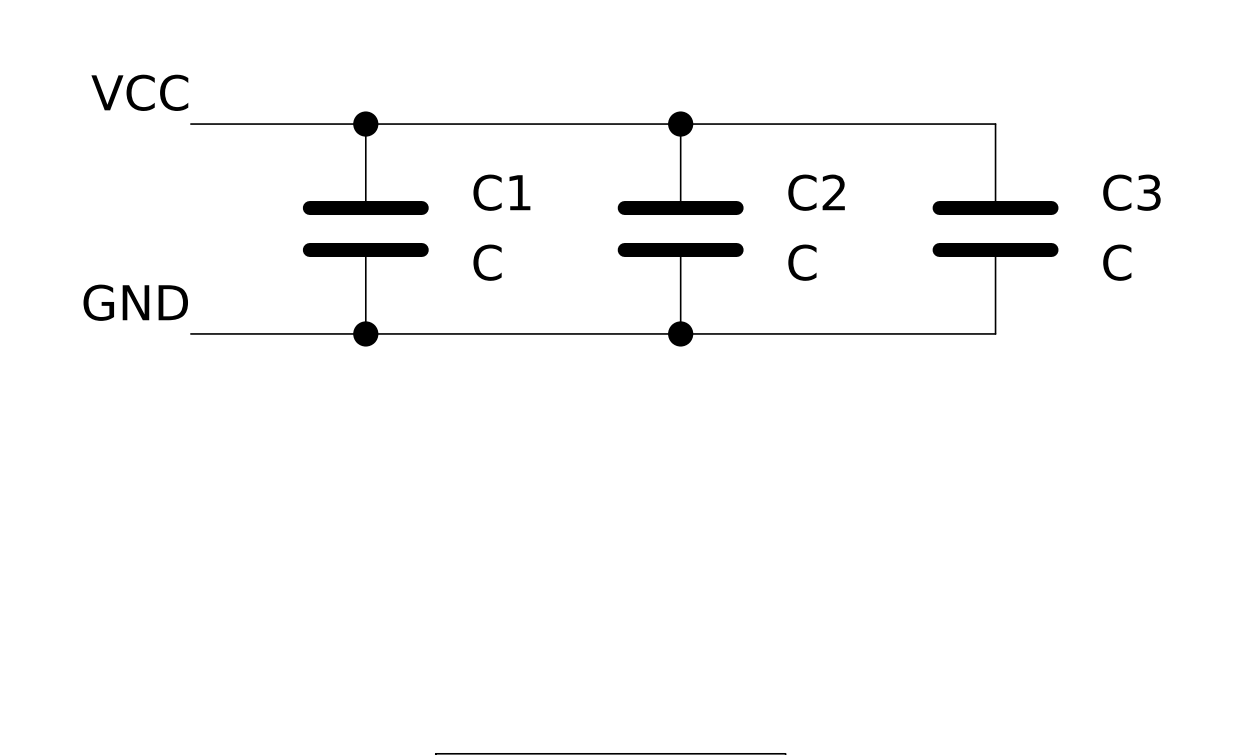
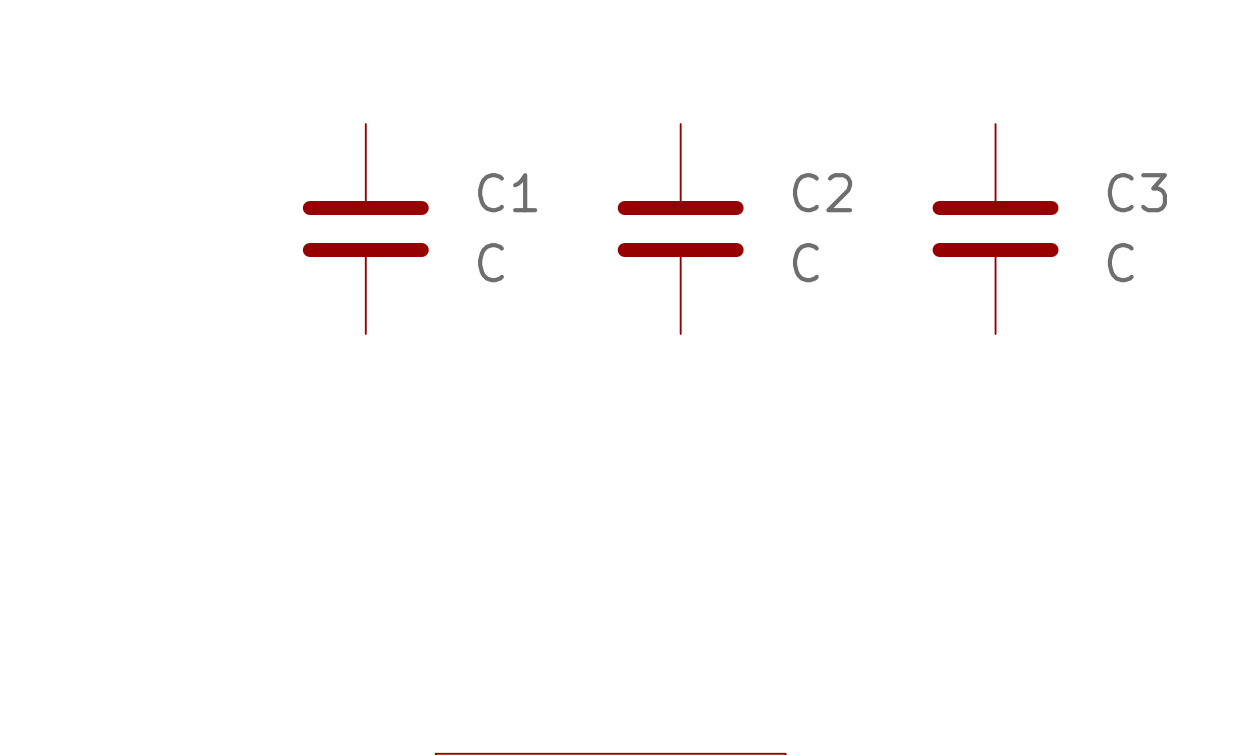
label: VCC (139, 92) -> none
wire: (190, 124) (995, 124) -> none
junction: (365, 124) -> none
junction: (680, 124) -> none
label: GND (135, 302) -> none
wire: (190, 333) (995, 333) -> none
junction: (365, 333) -> none
junction: (680, 333) -> none

